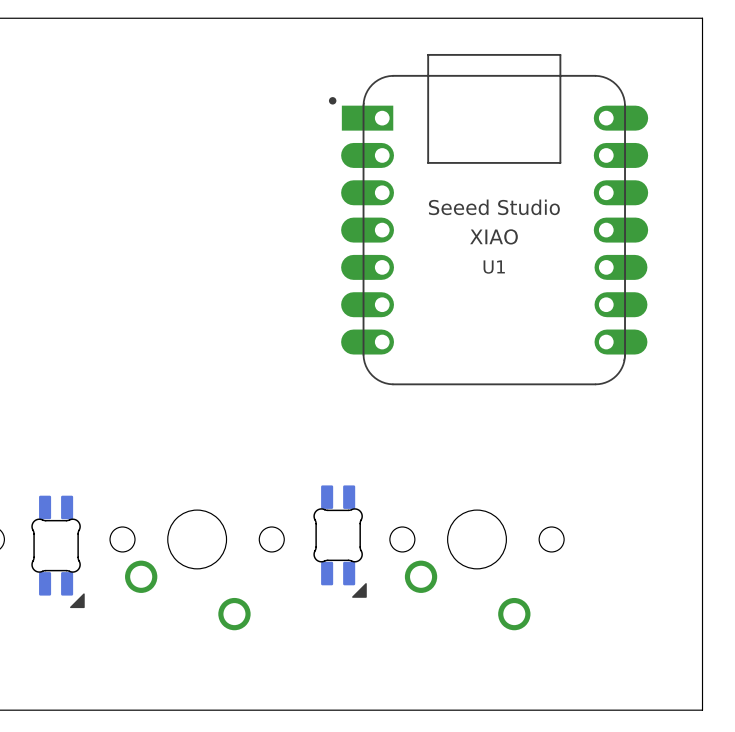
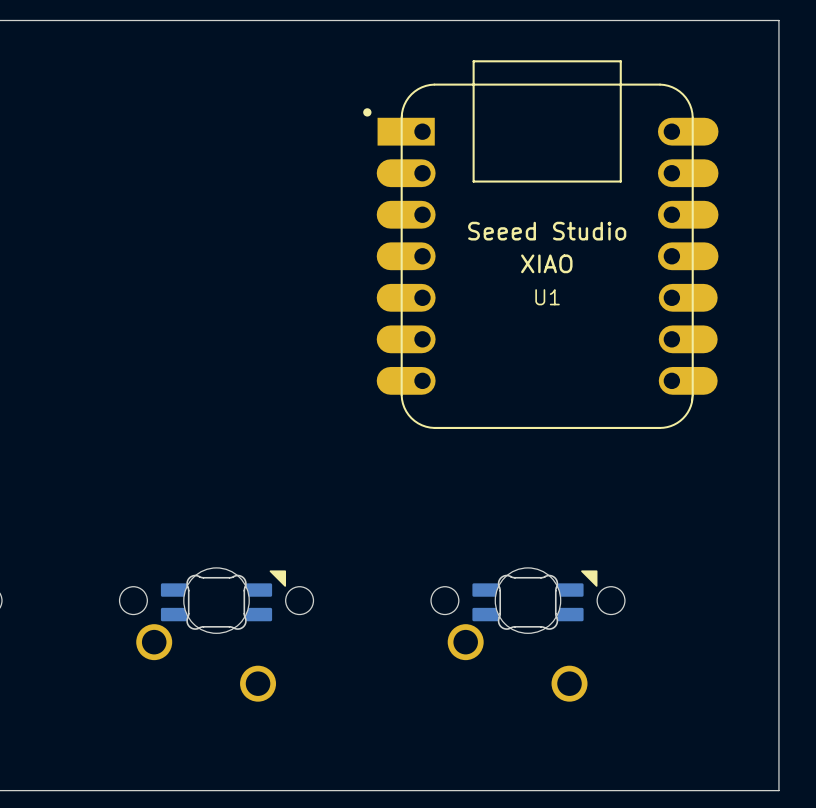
part: none -> (223, 600)
part: none -> (534, 600)
part: (340, 541) -> none
part: (58, 551) -> none

